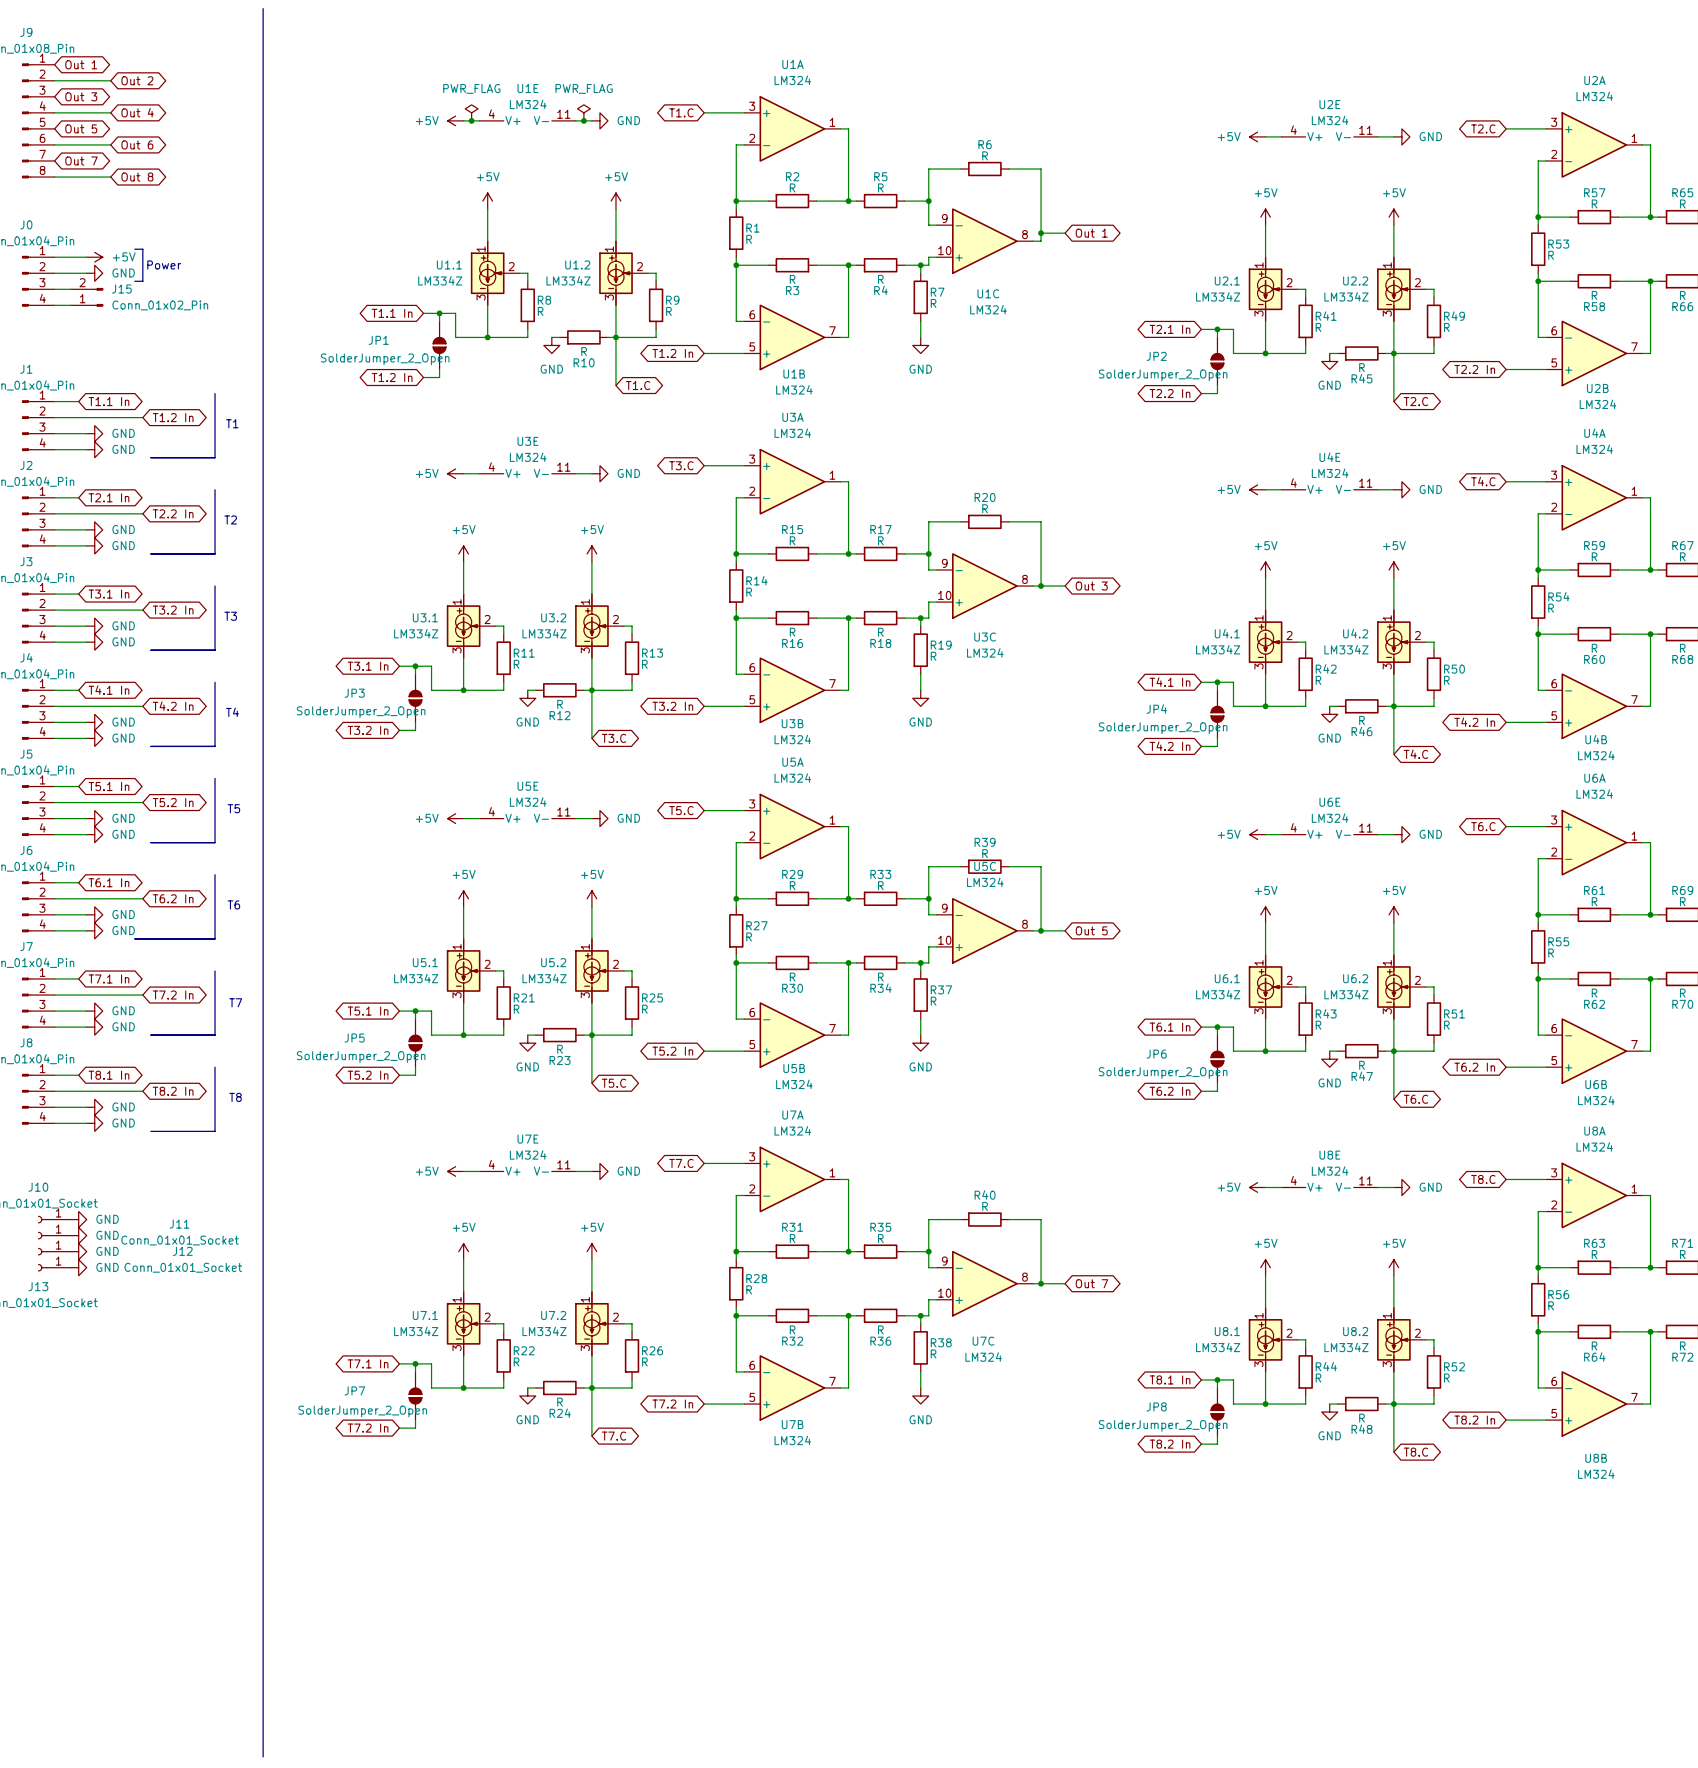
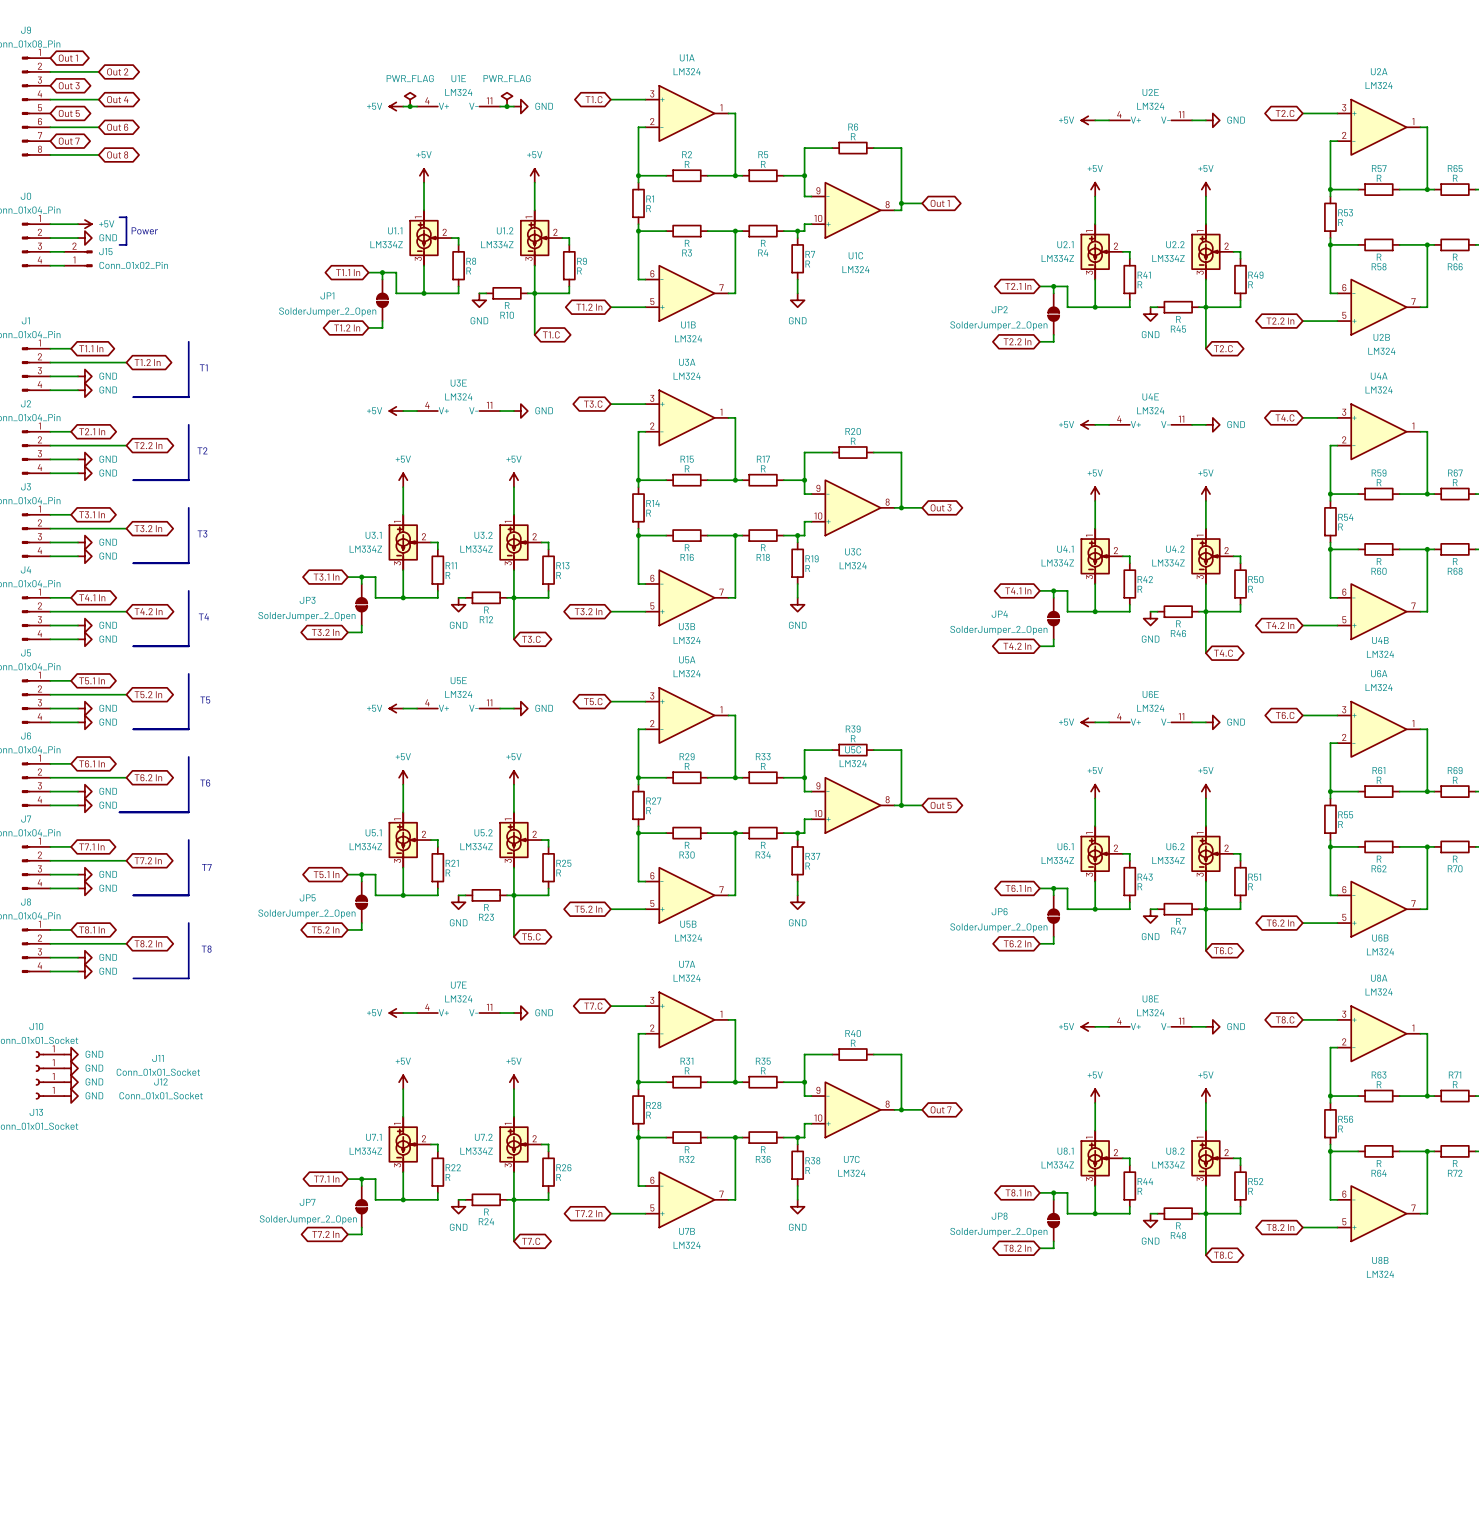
line: (263, 8) (263, 1756) -> none

